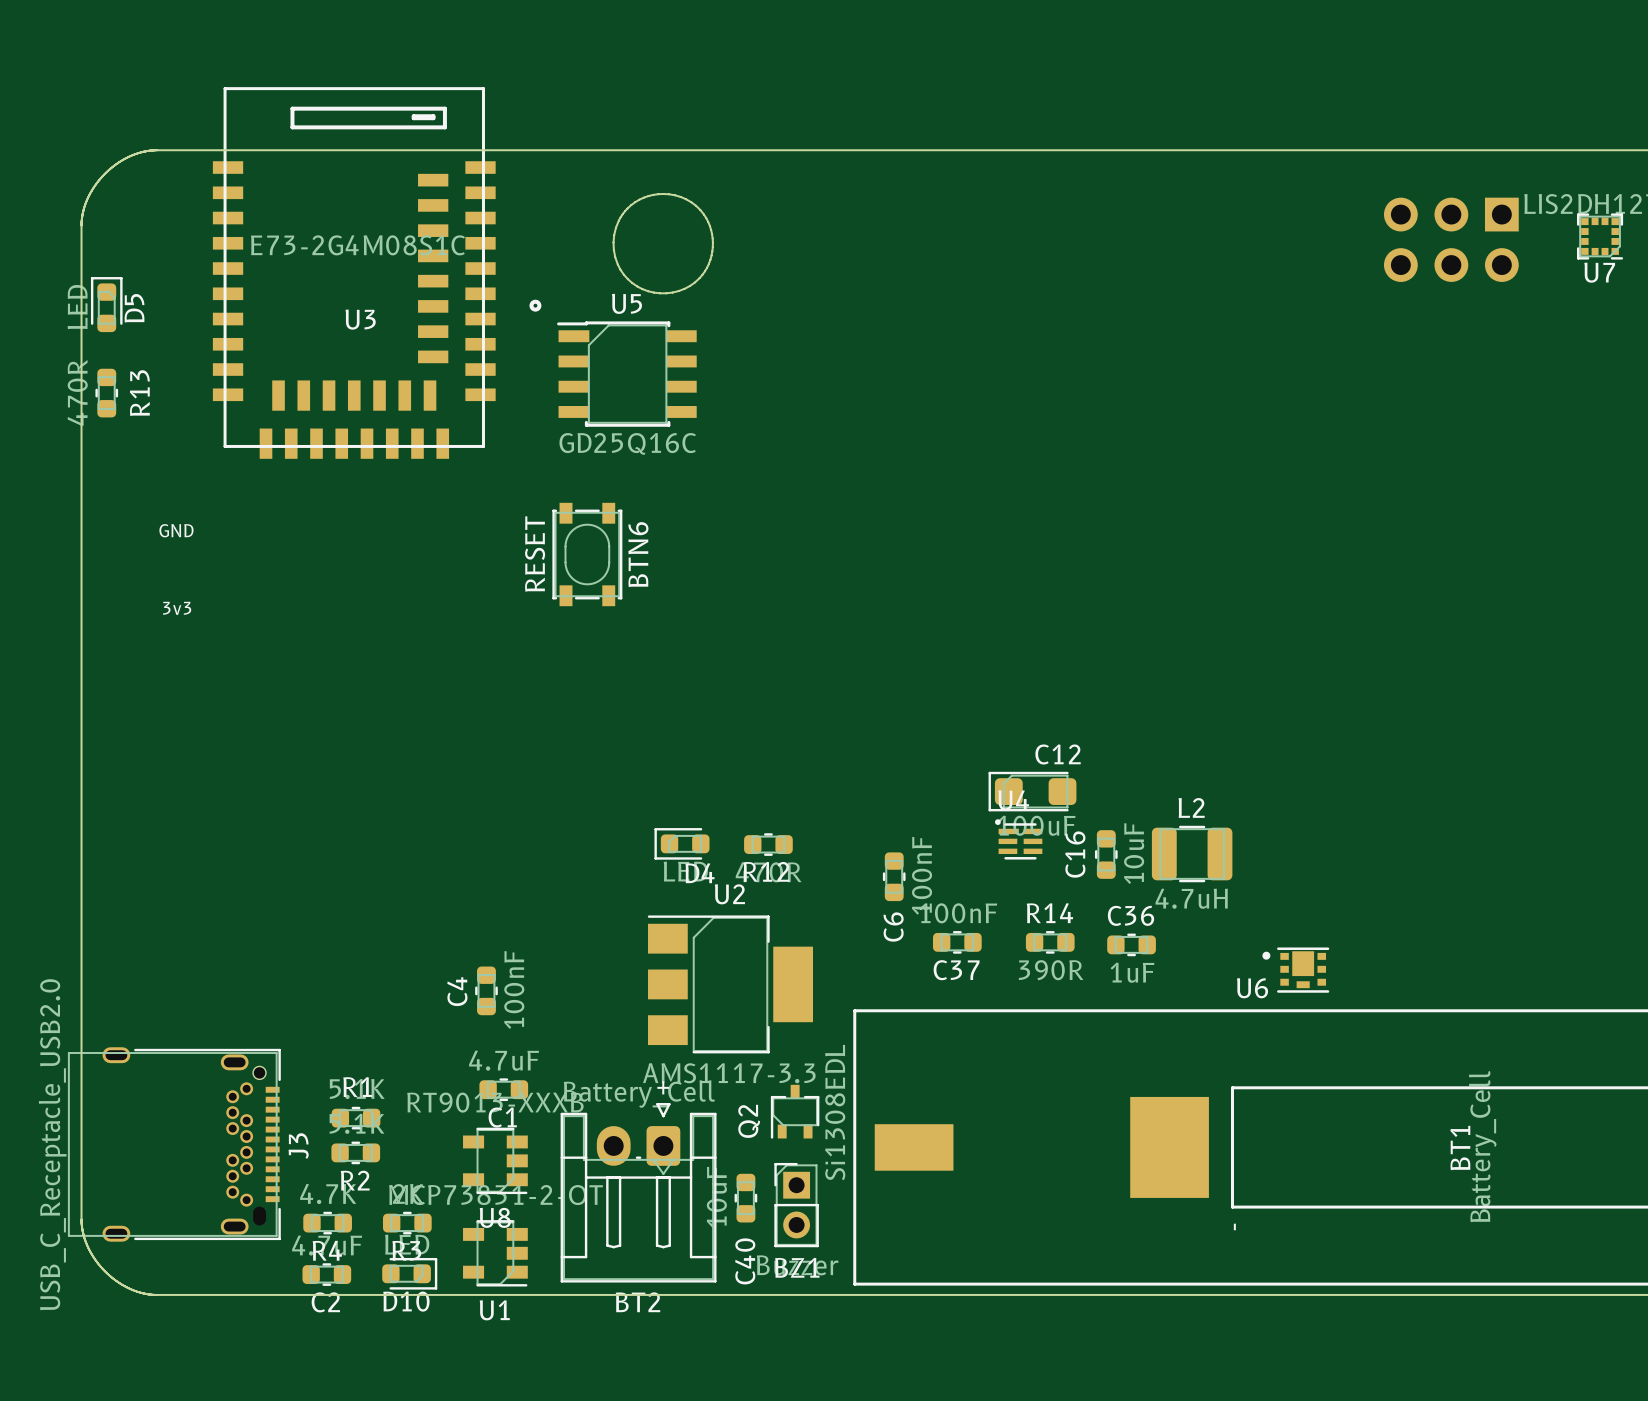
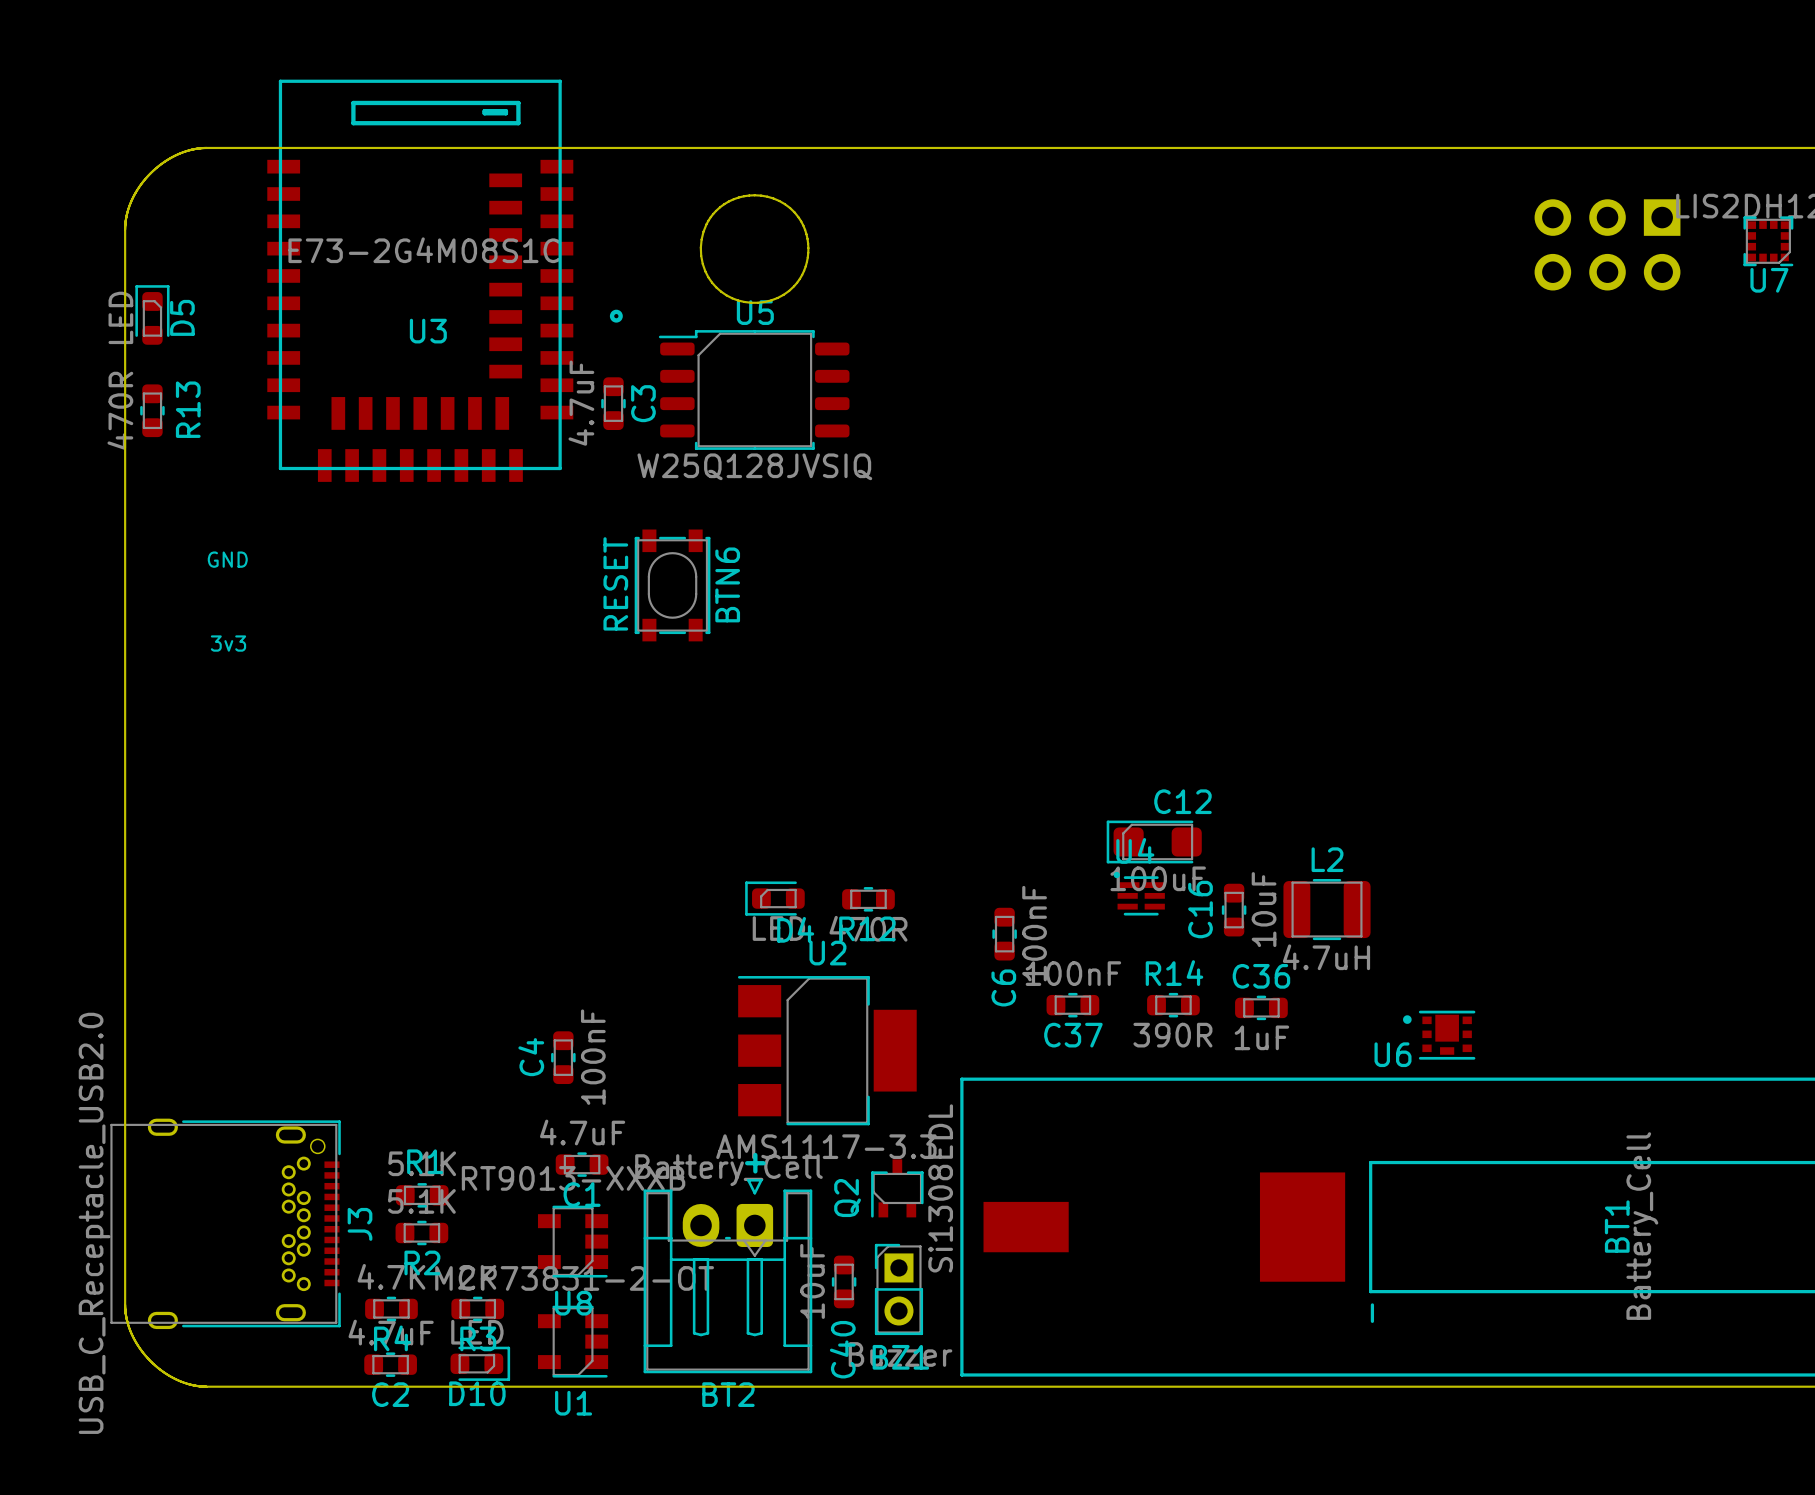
U5 footprint: [557, 321, 697, 427] -> [658, 330, 850, 450]
C3: none -> 4.7uF (613, 403)
U5 value: GD25Q16C (627, 443) -> W25Q128JVSIQ (754, 466)

